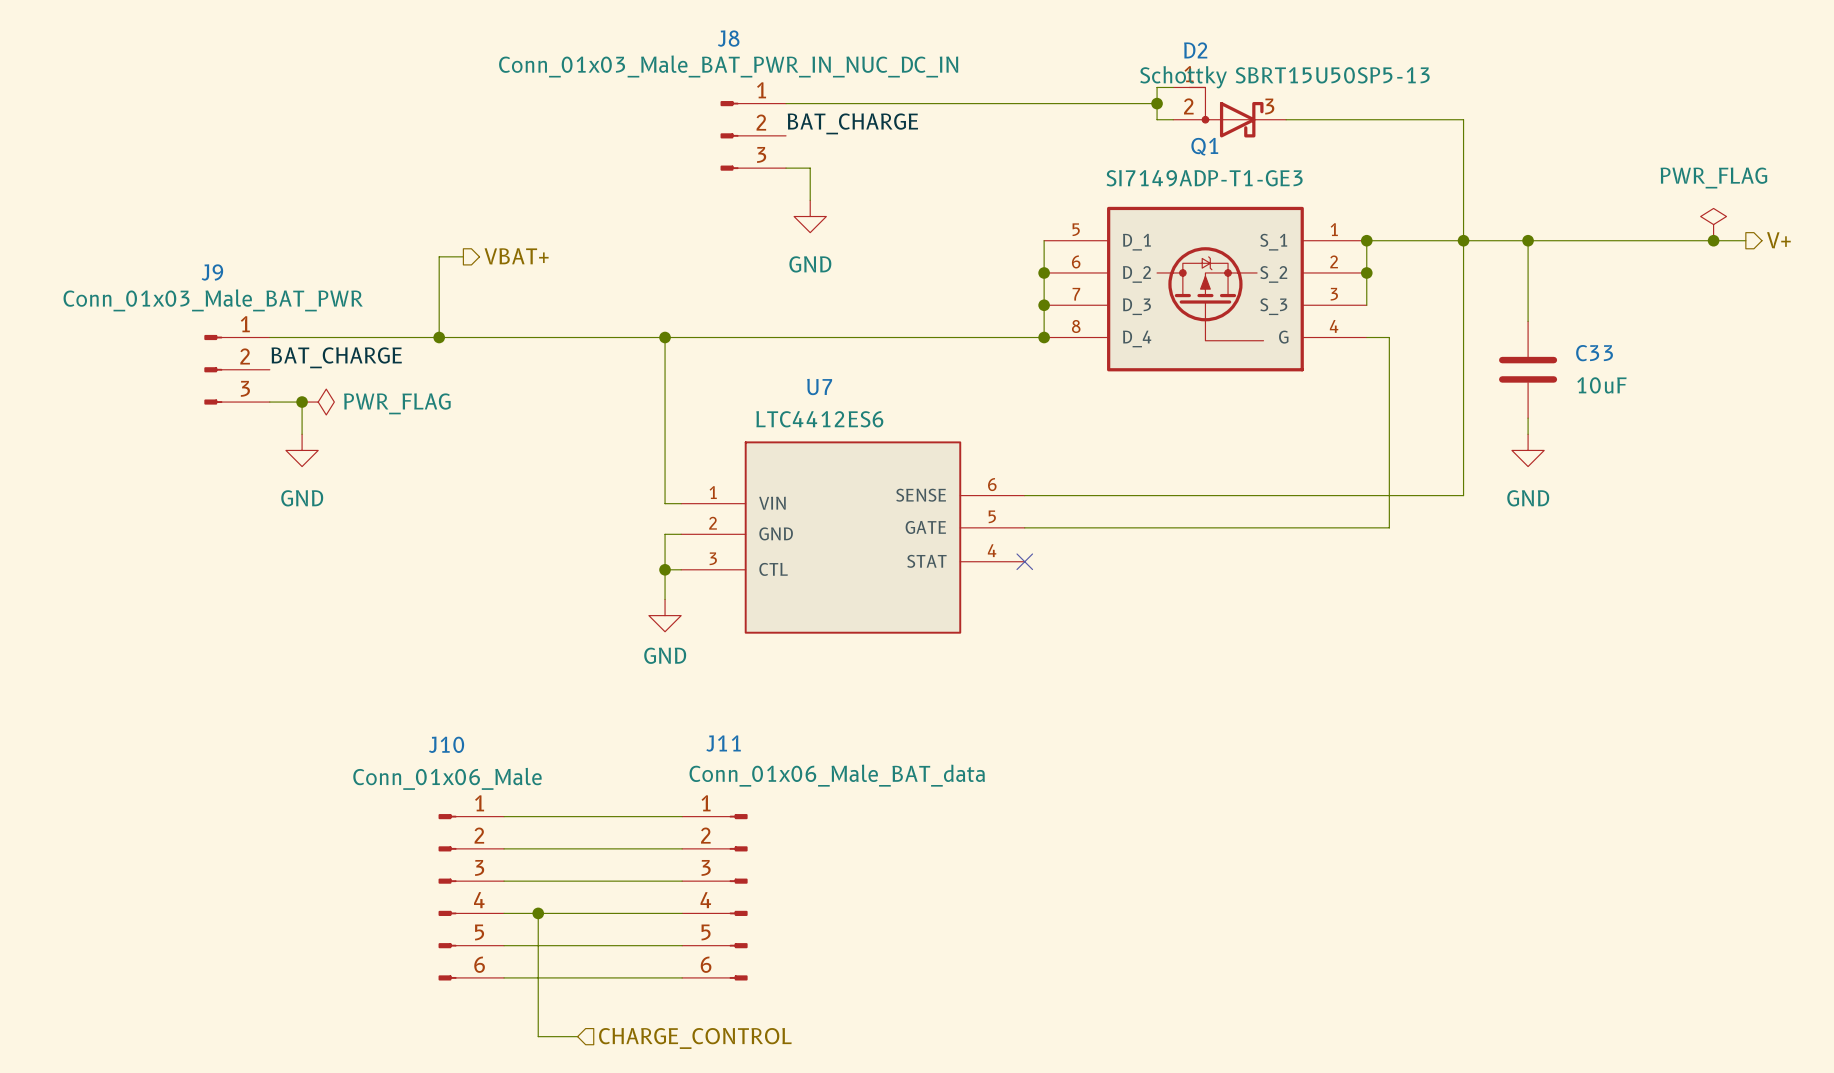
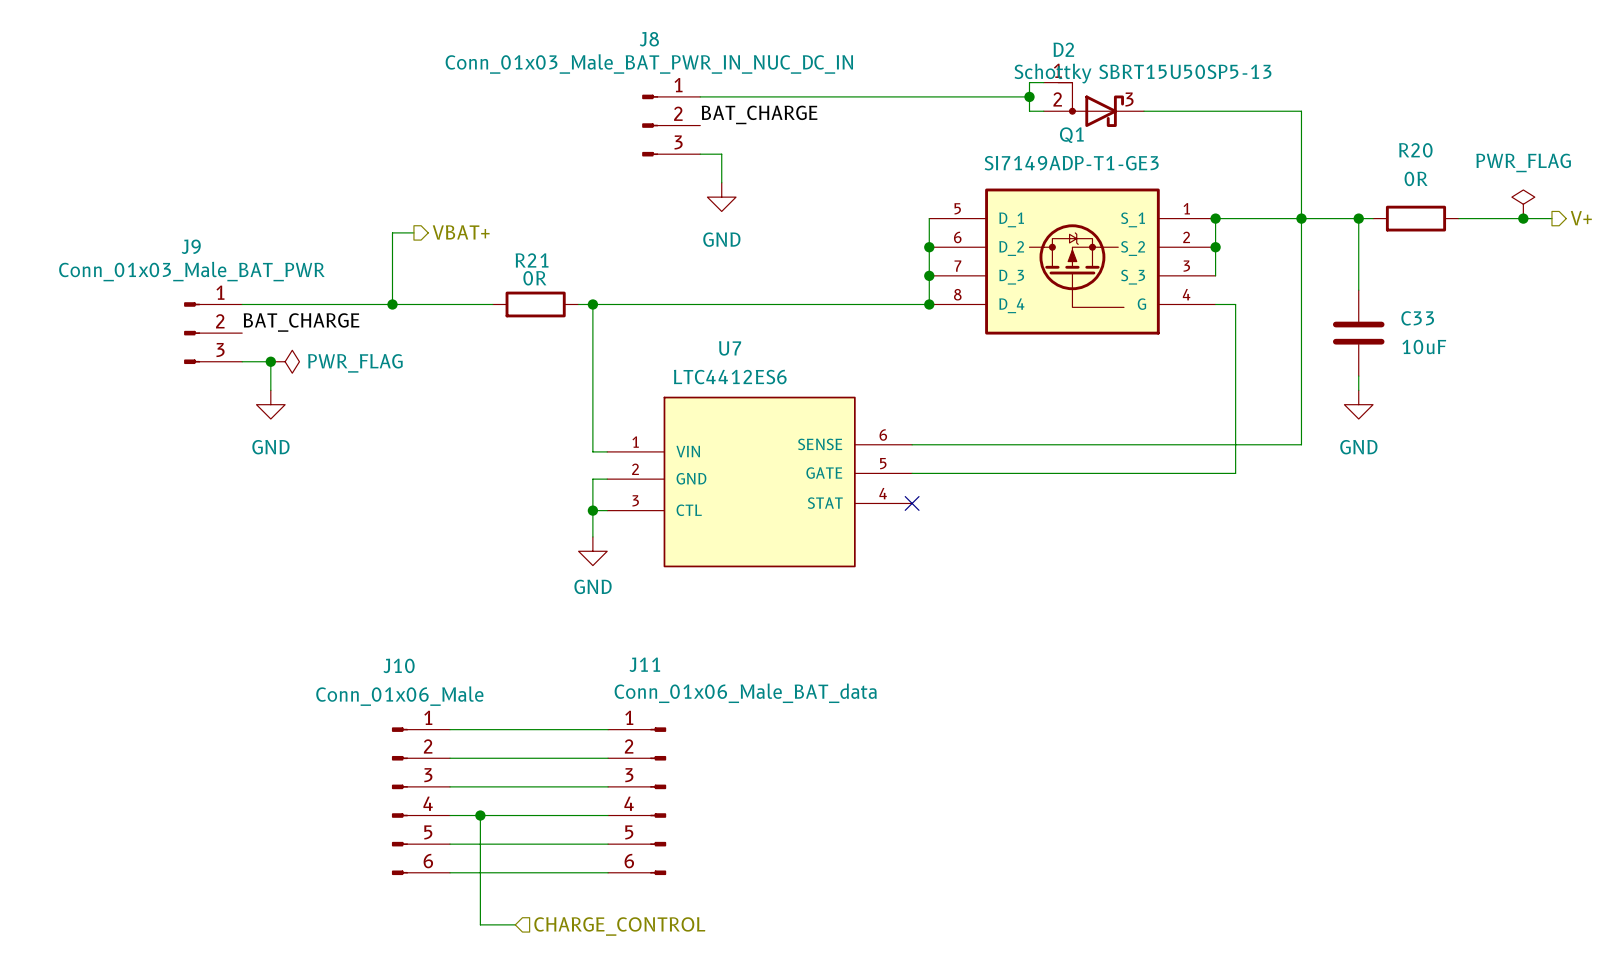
wire: (1544, 240) (1641, 240) -> none
R20: none -> 0R (1415, 218)
wire: (552, 337) (648, 337) -> none
R21: none -> 0R (535, 304)

